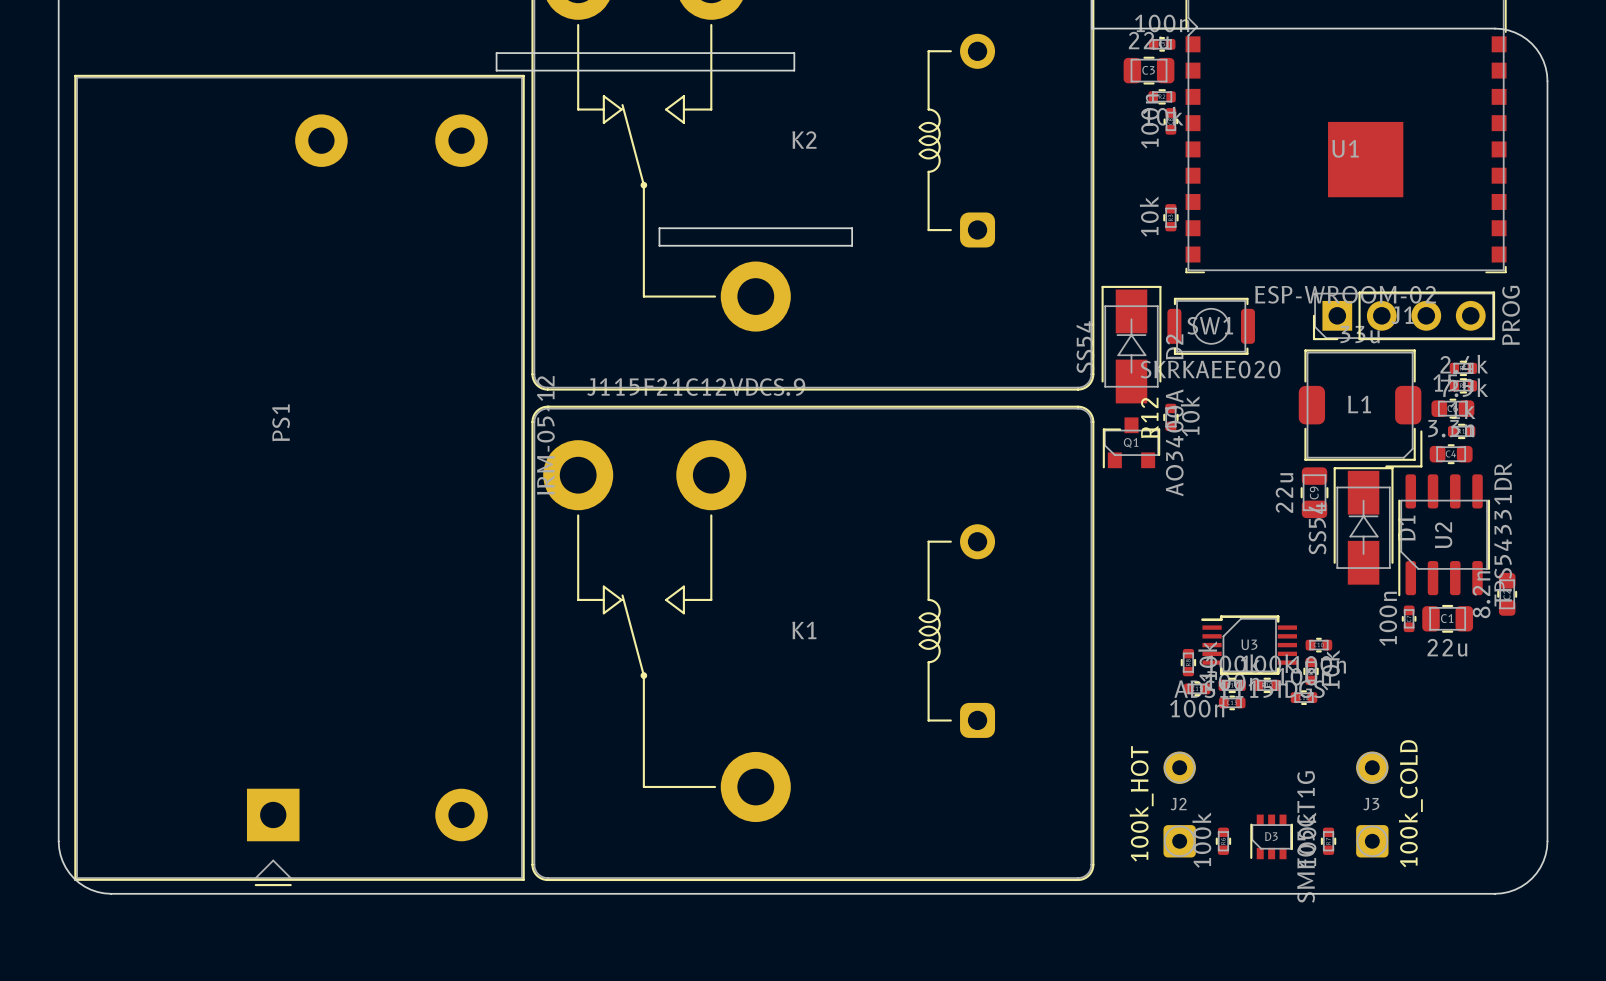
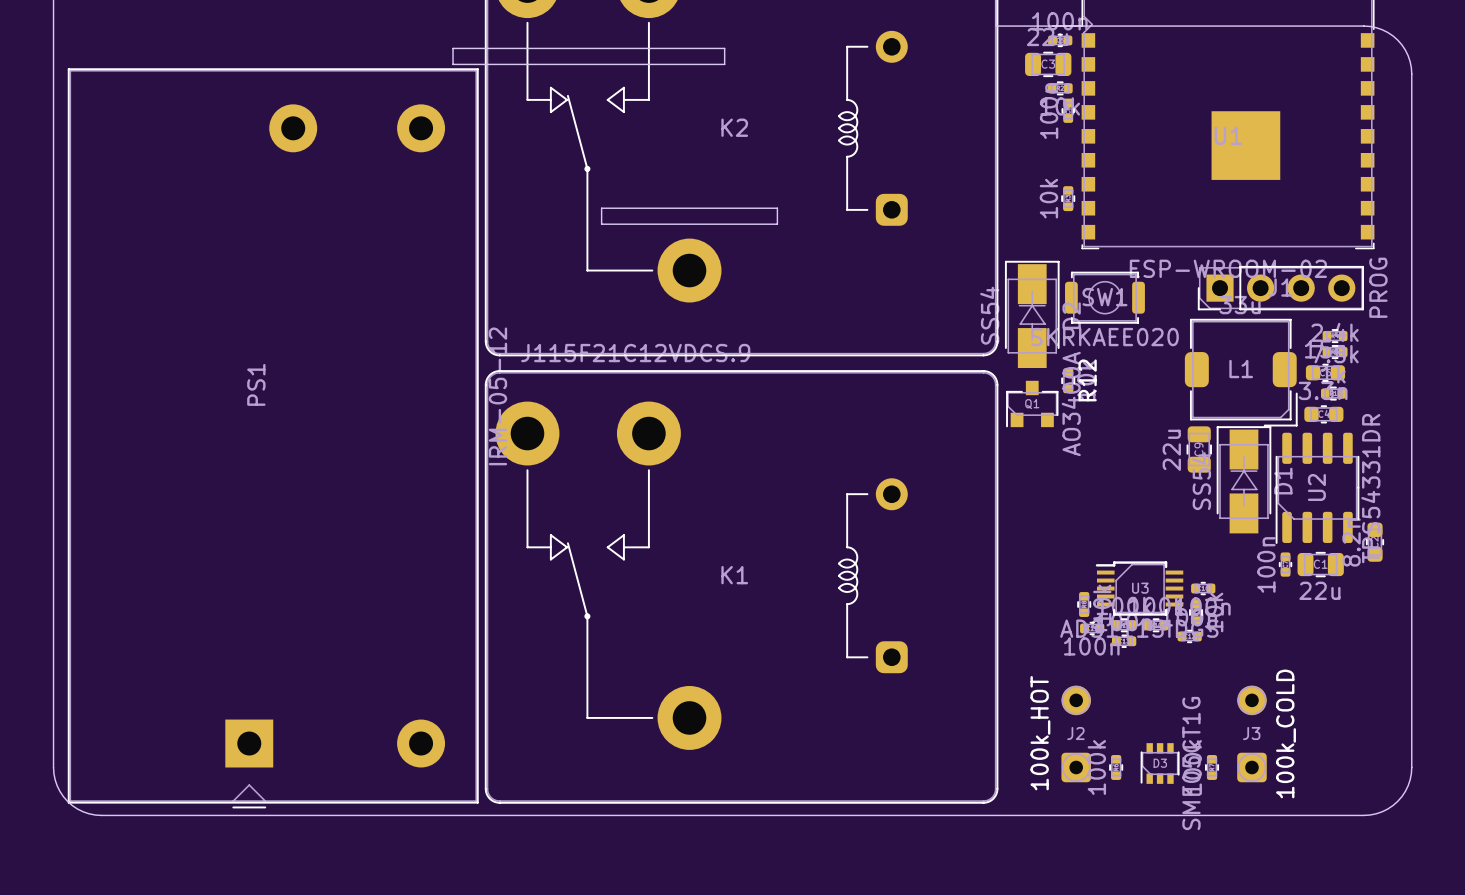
R12 name position: R12 (1149, 417) -> R12 (1087, 380)

